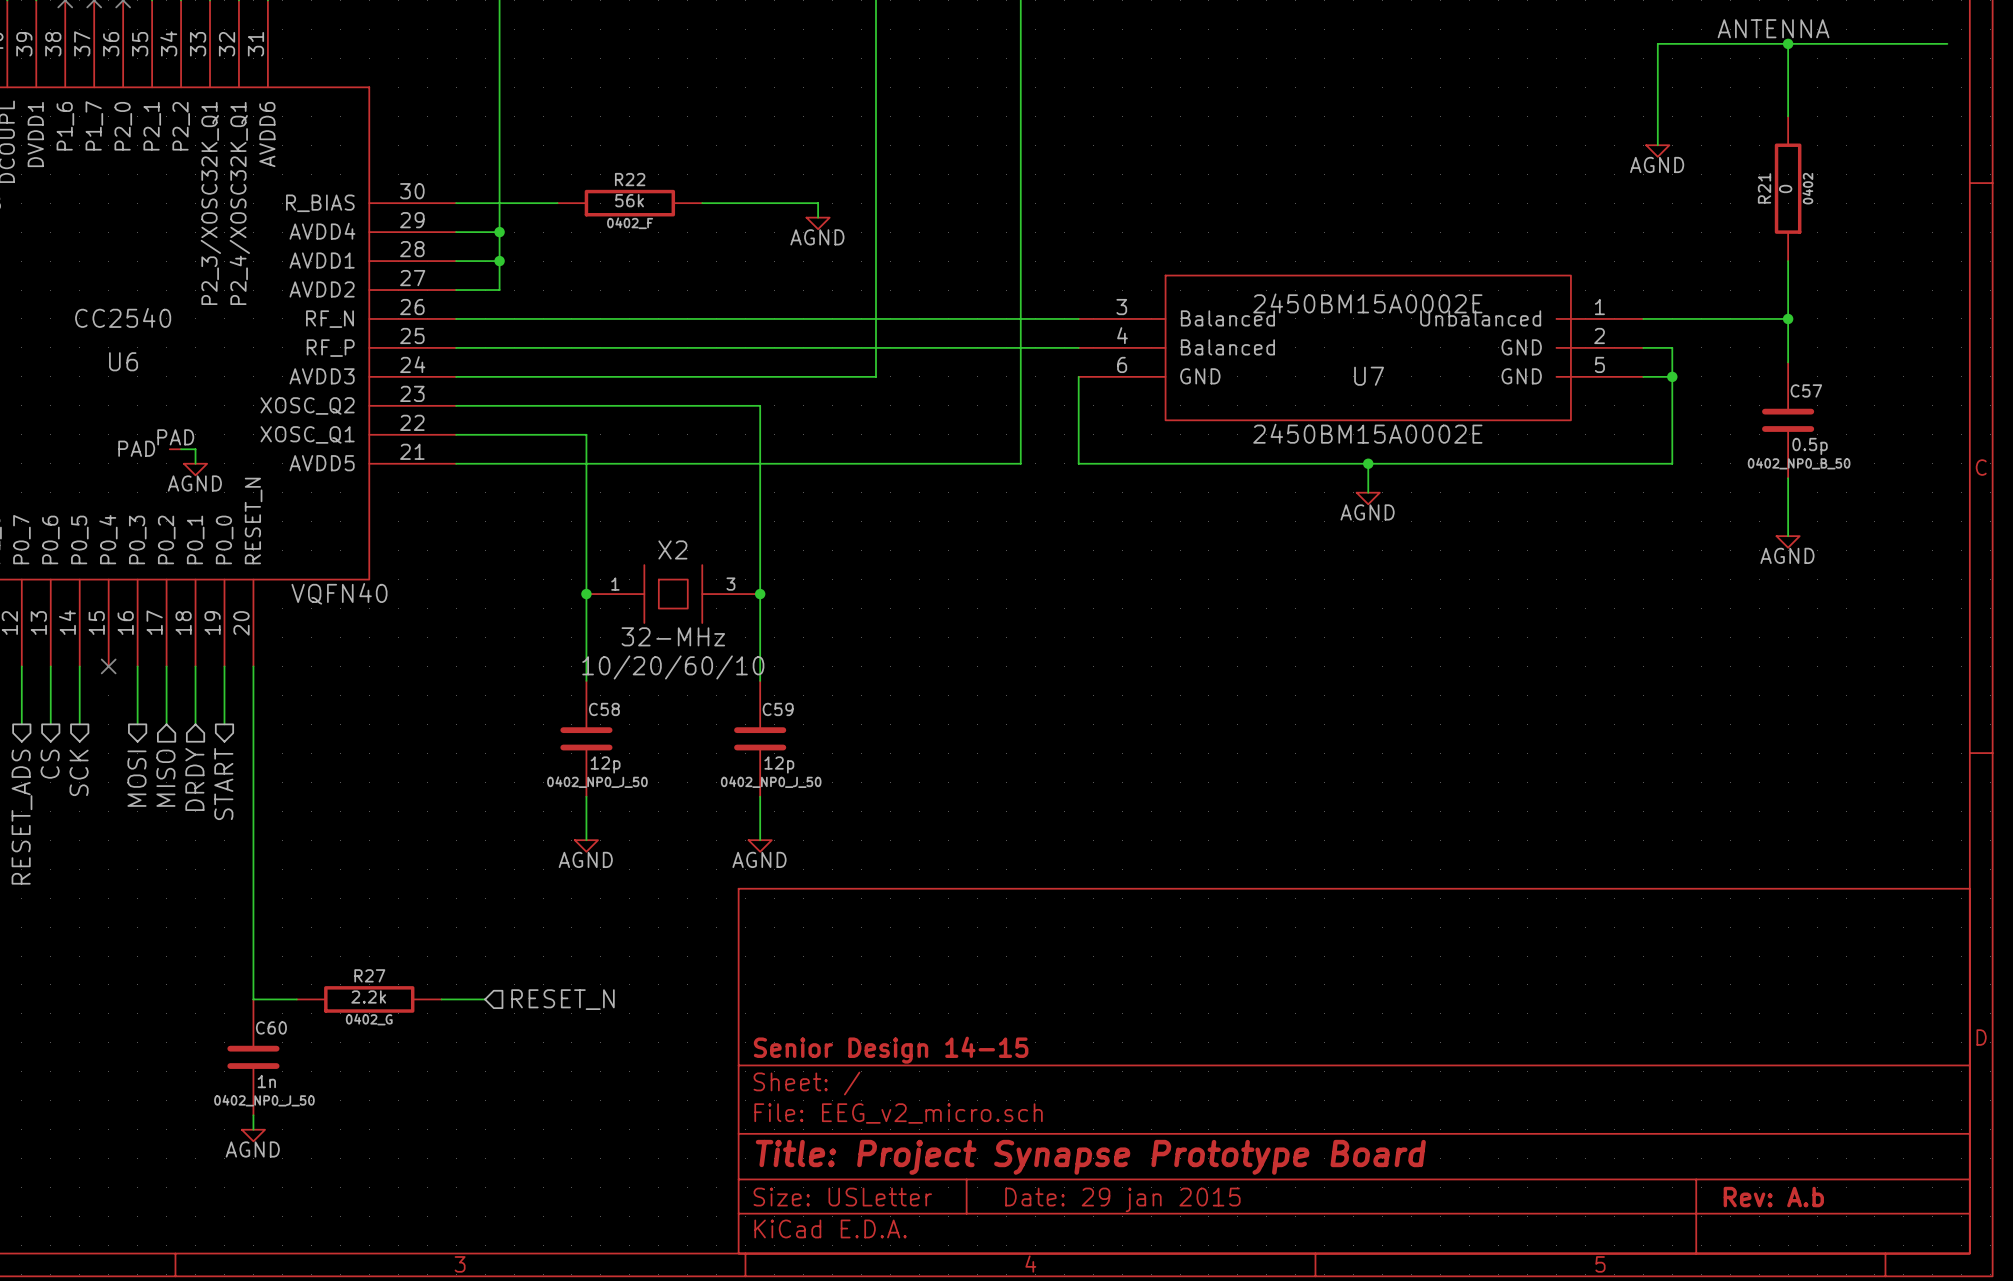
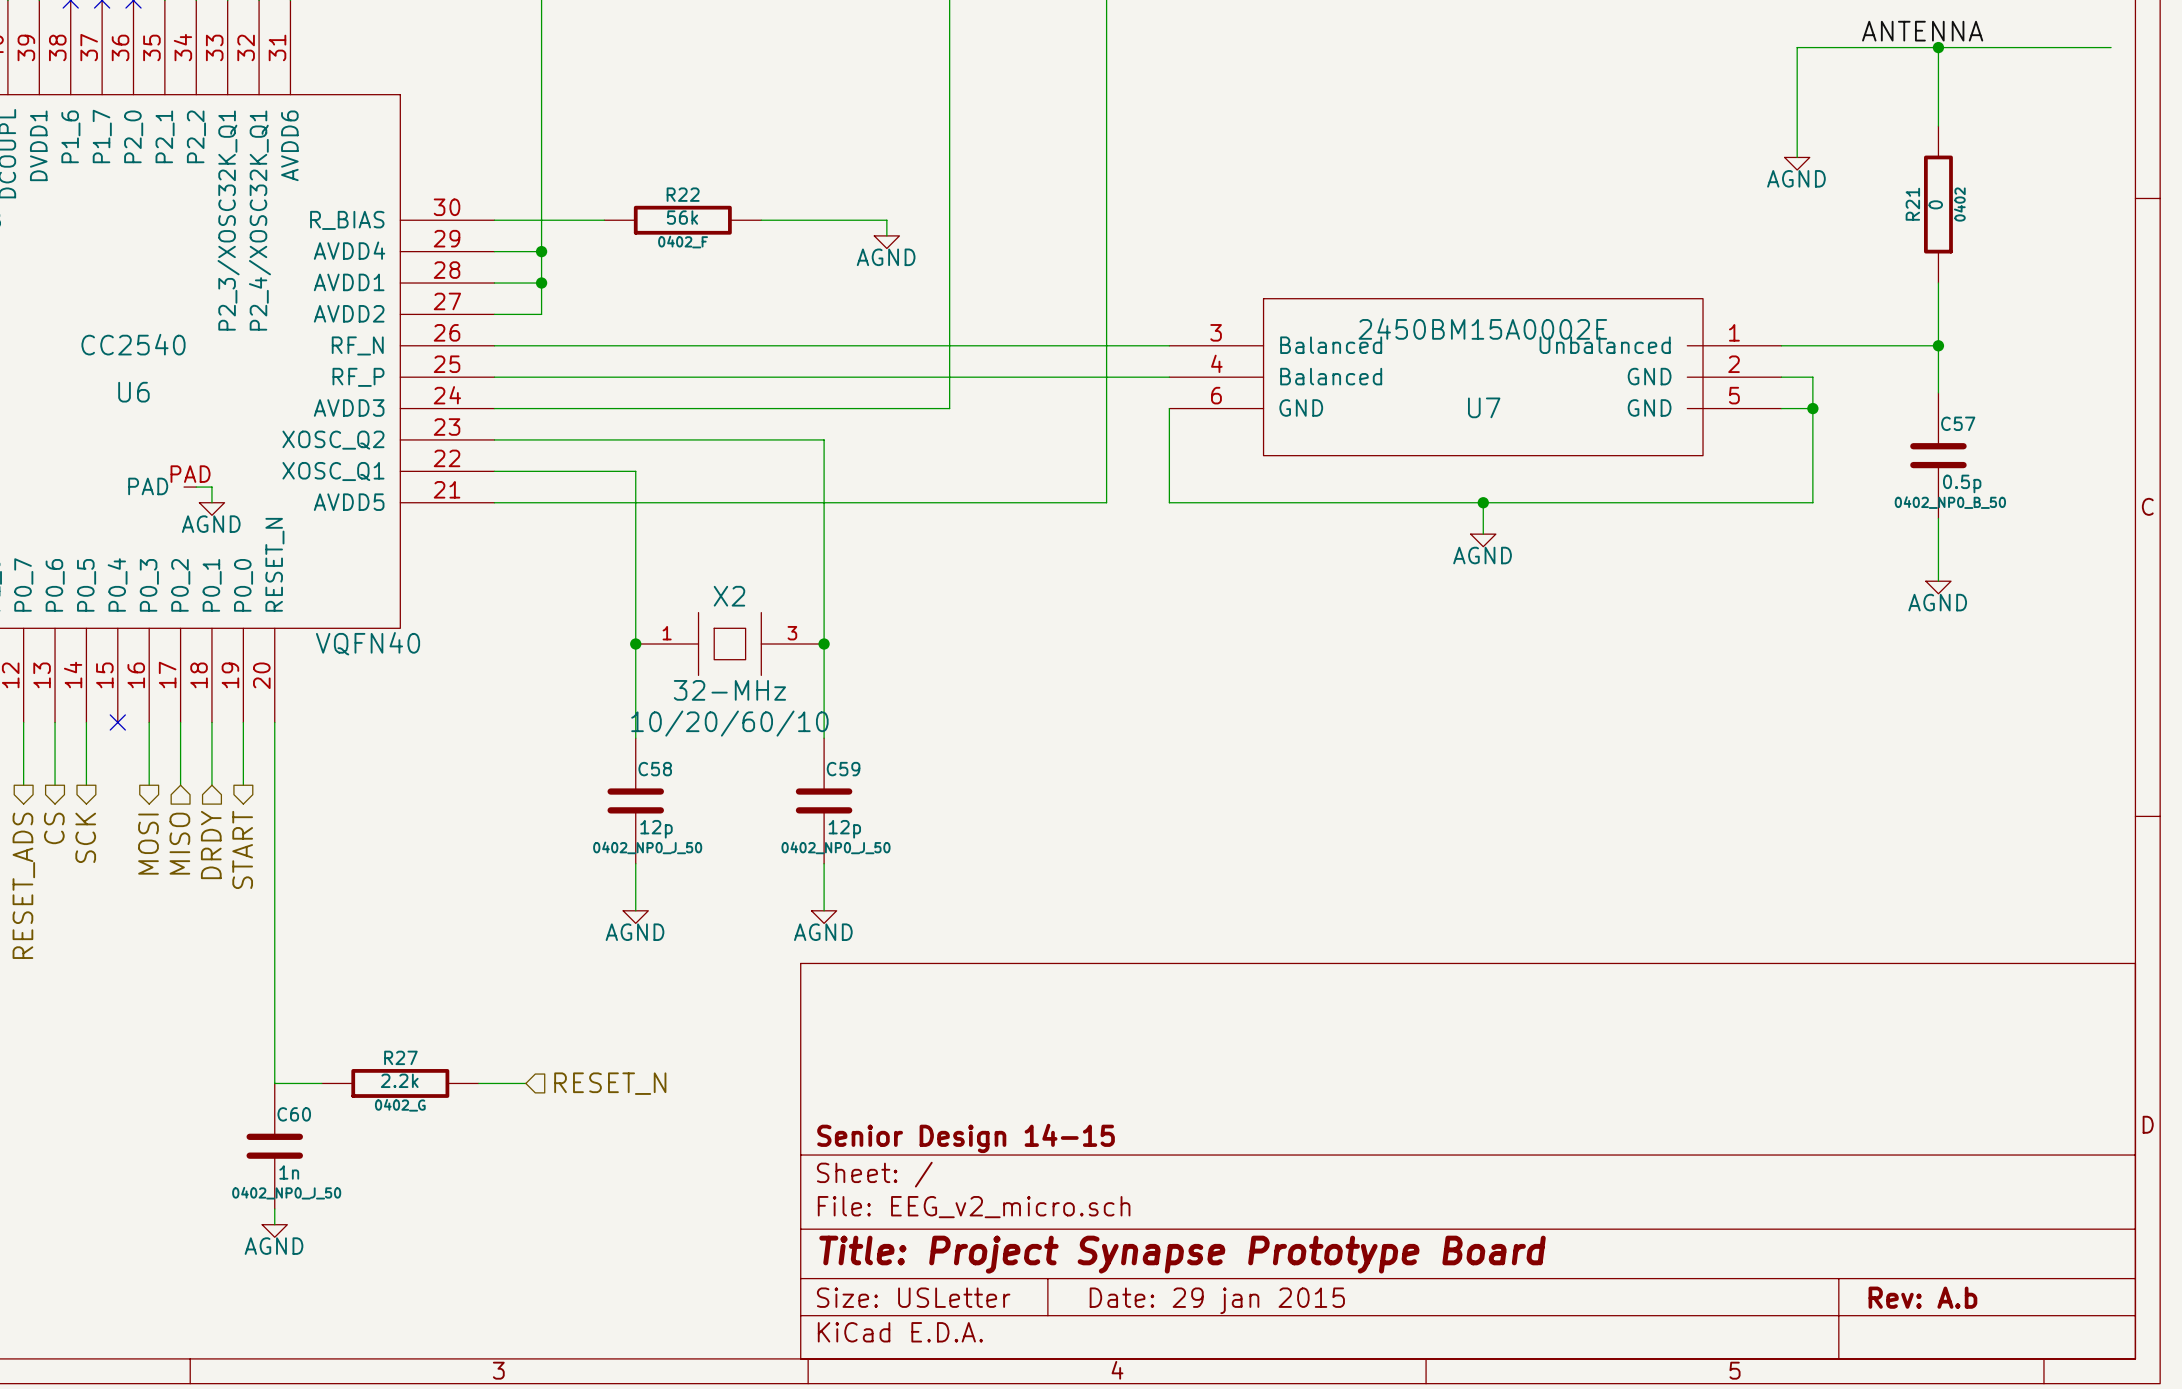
U7 text: 2450BM15A0002E (1367, 433) -> none

